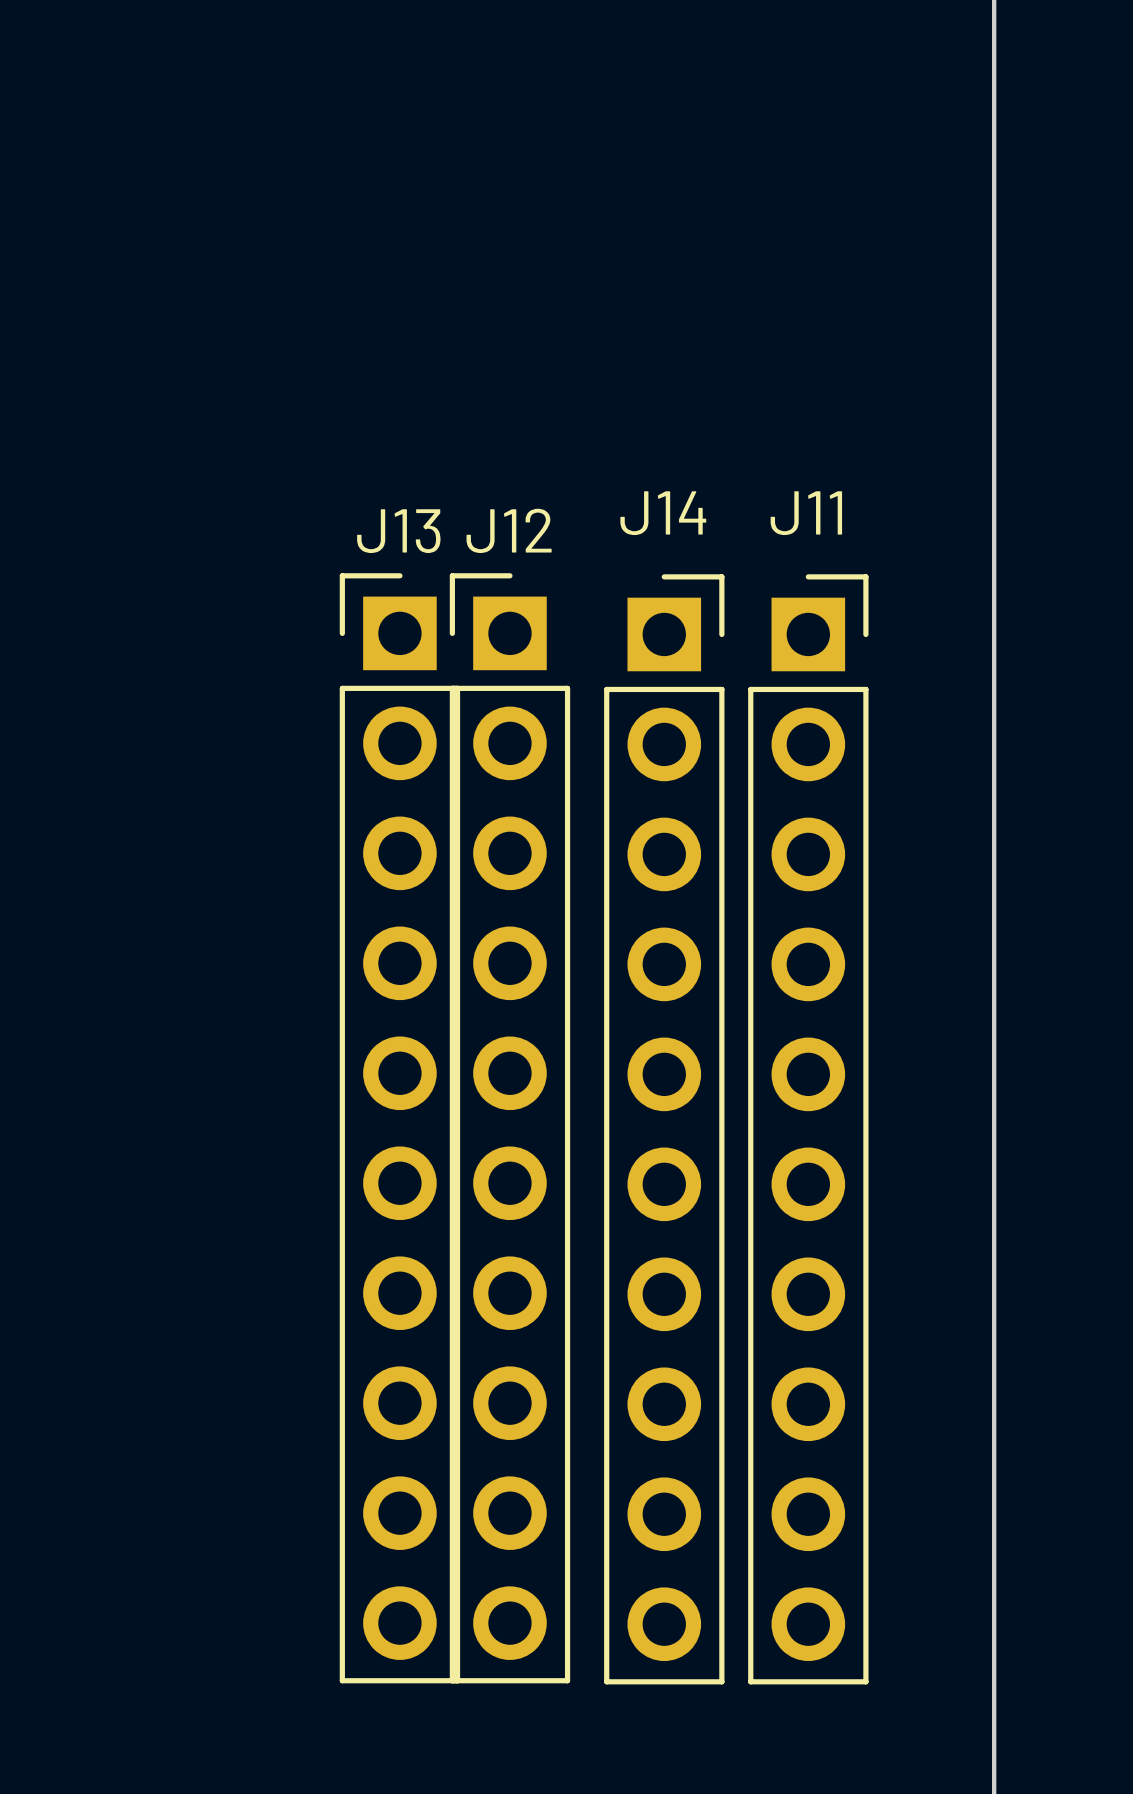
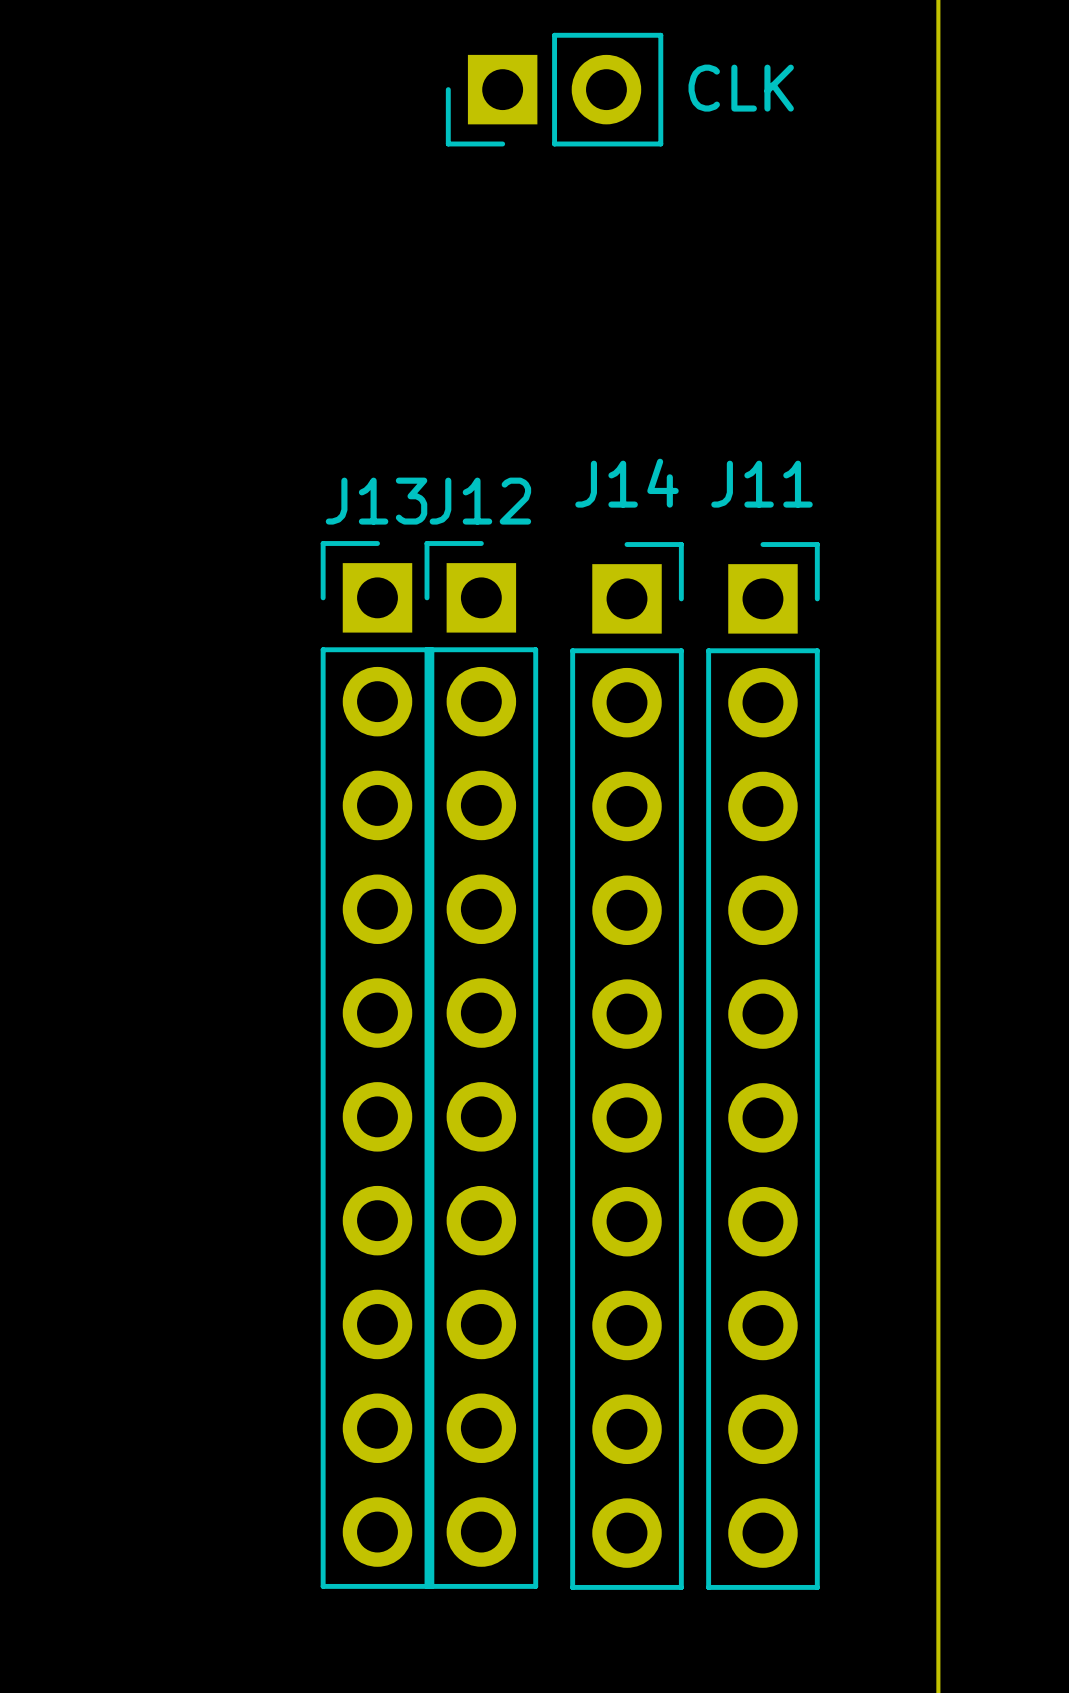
part: none -> CLK (554, 89)

